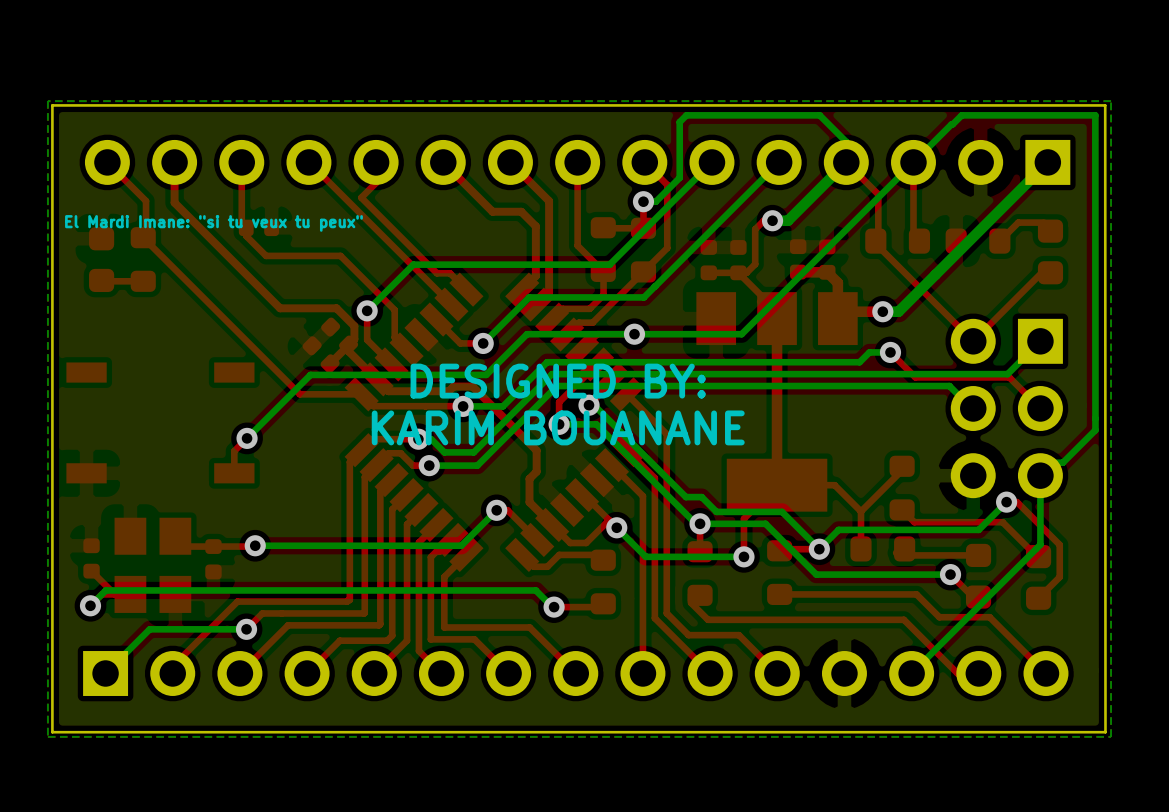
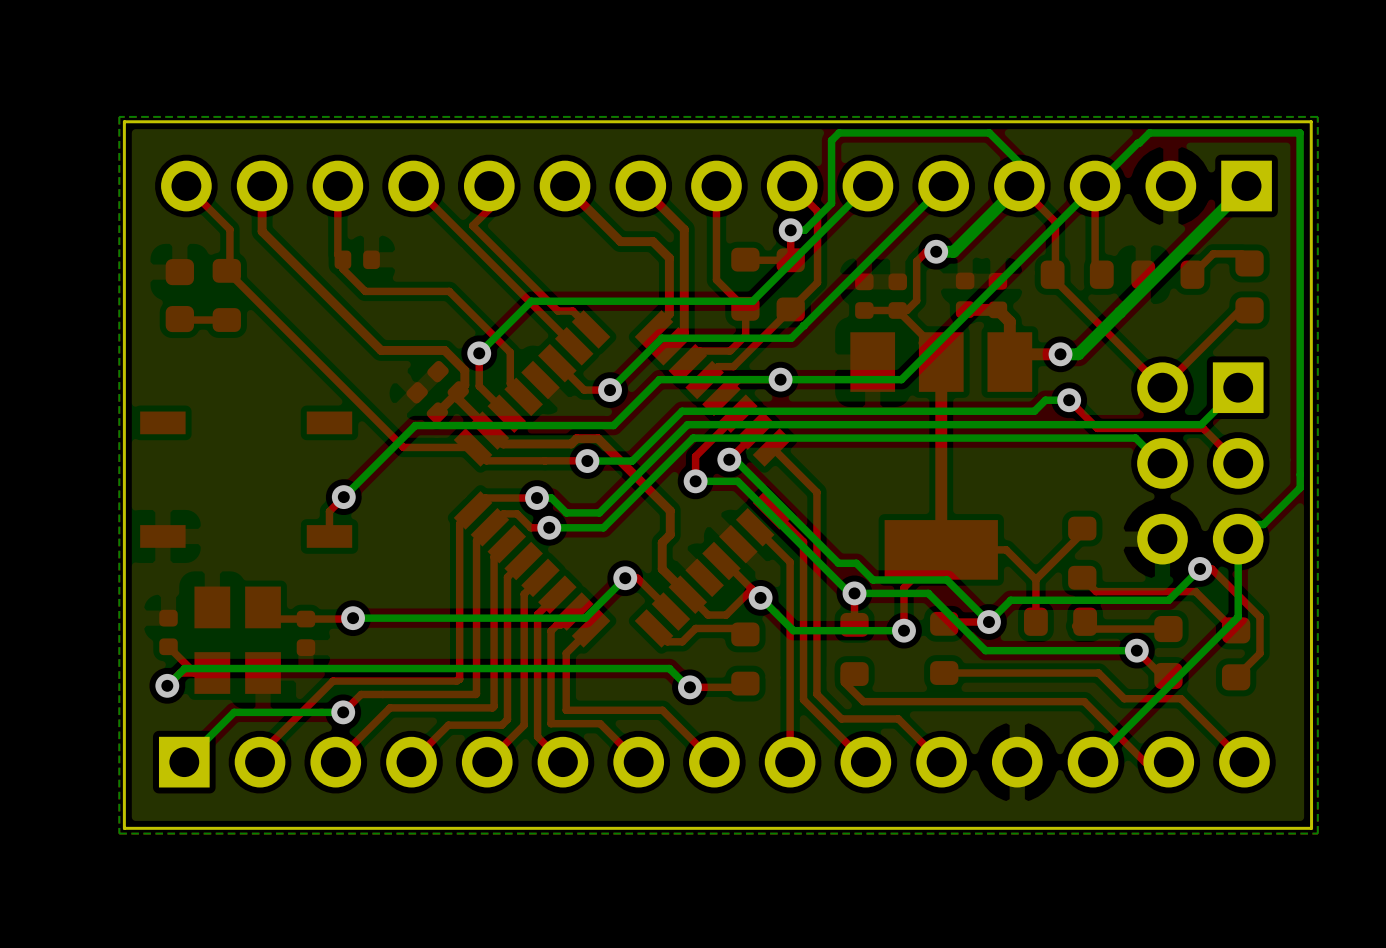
text: El Mardi Imane: "si tu veux tu peux" (213, 223) -> none
text: DESIGNED BY: (558, 381) -> none
text: KARIM BOUANANE (558, 427) -> none

